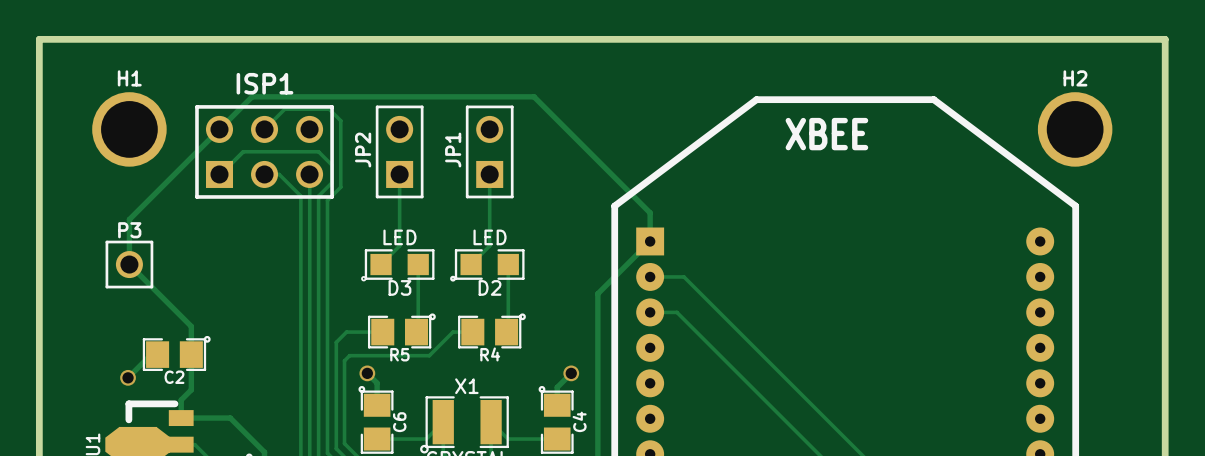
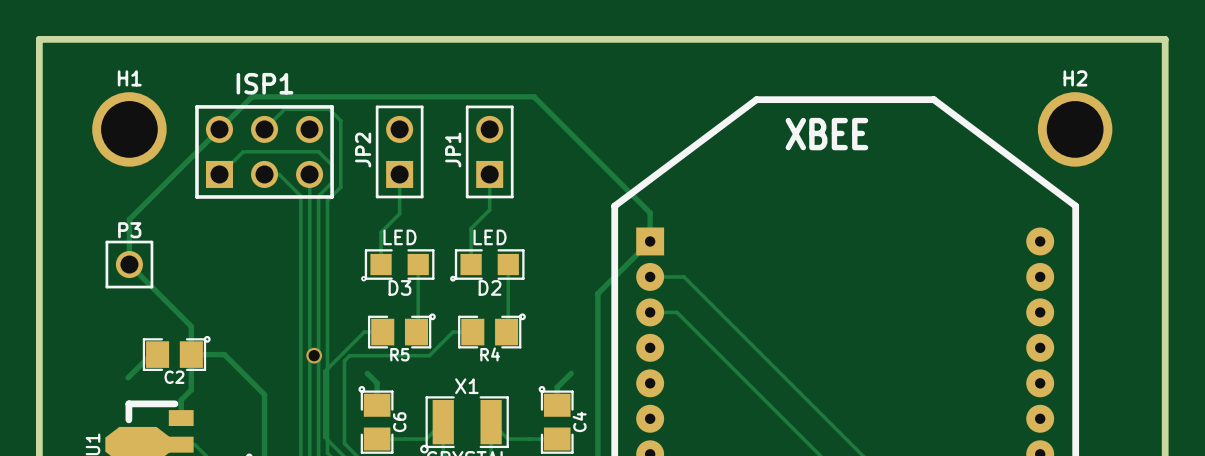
track: (489, 209) (489, 245) (471, 264) -> (489, 209) (471, 228) (471, 264)
track: (399, 213) (399, 245) (381, 264) -> (399, 213) (381, 232) (381, 264)
track: (364, 332) (346, 332) (336, 342) (336, 448) -> (364, 332) (324, 371) (324, 437) (336, 448)
via position: (367, 373) -> (314, 355)
via: (571, 373) -> none
via: (128, 377) -> none
track: (181, 418) (230, 418) (264, 452) -> (191, 354) (224, 354) (264, 394) (264, 452)

